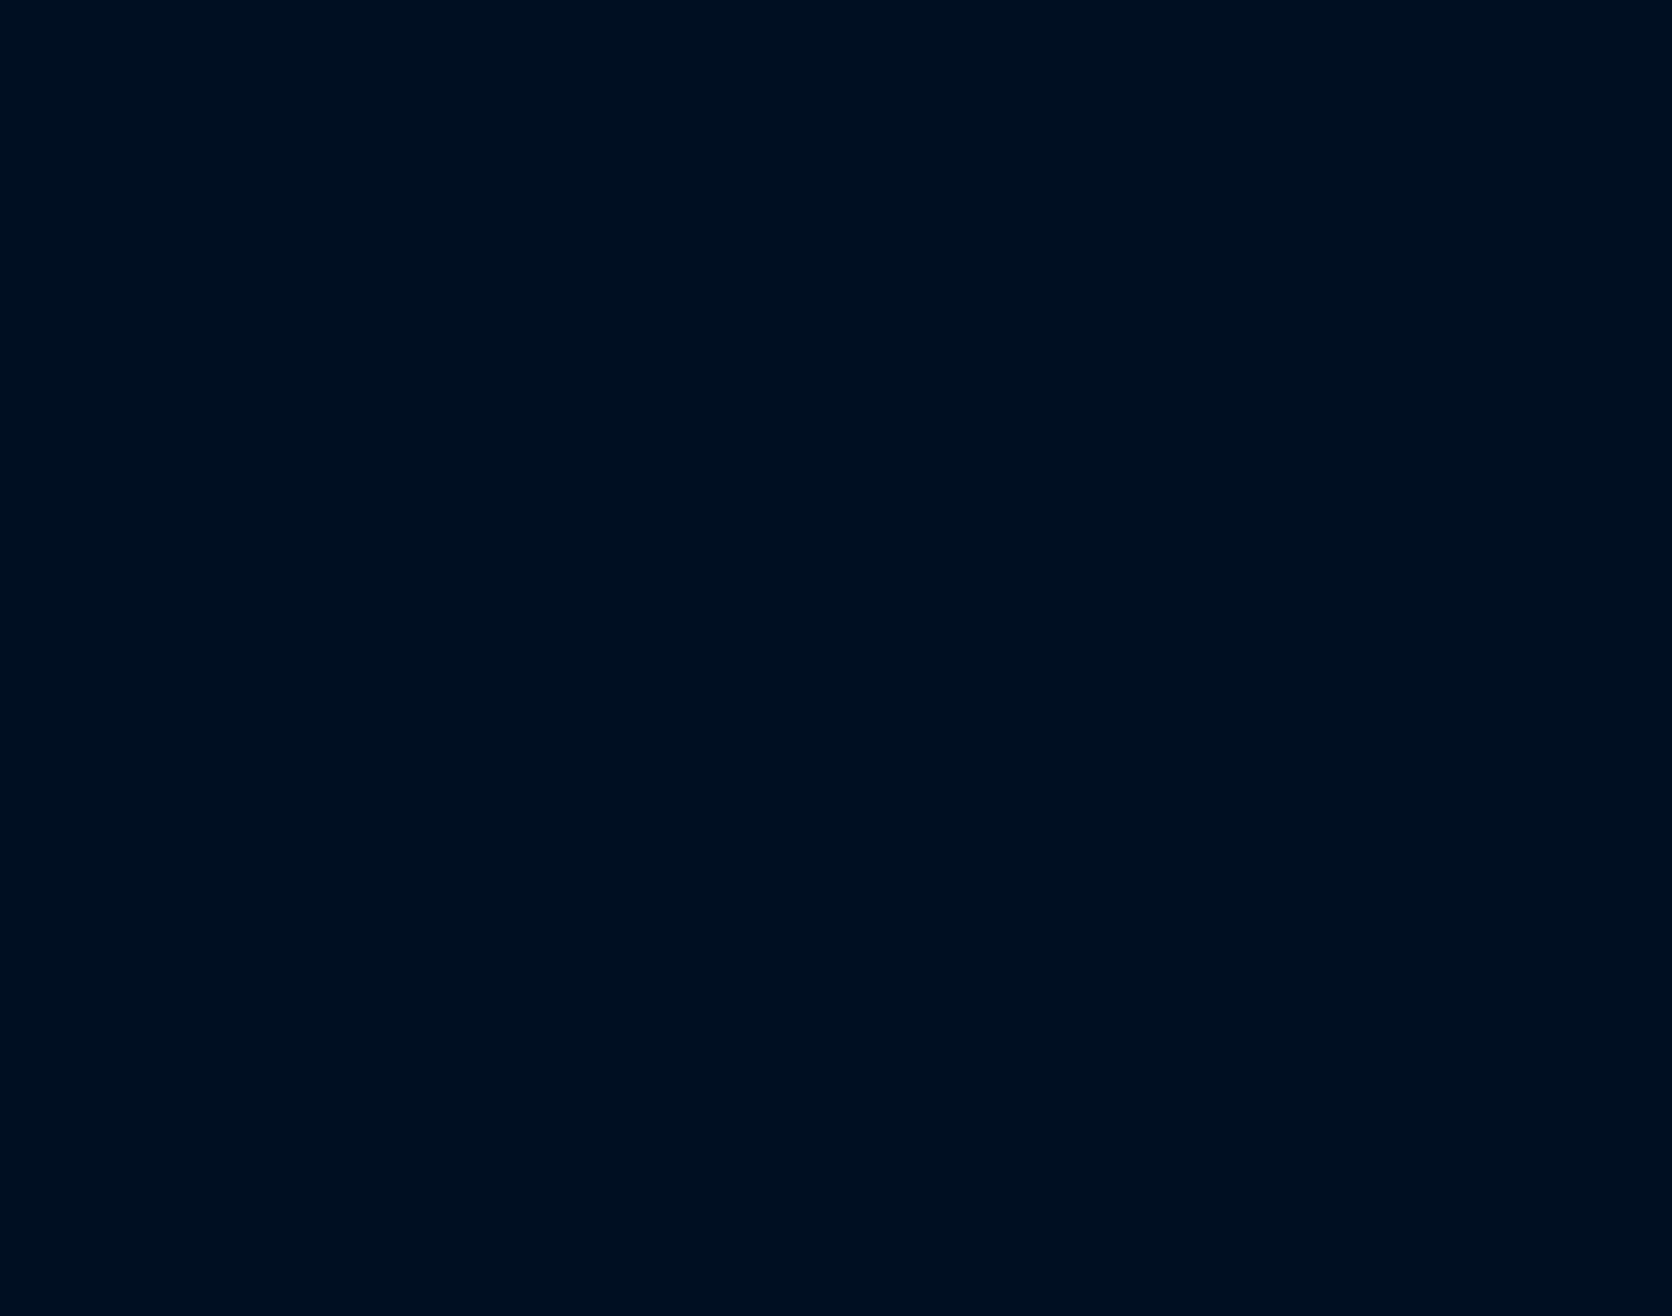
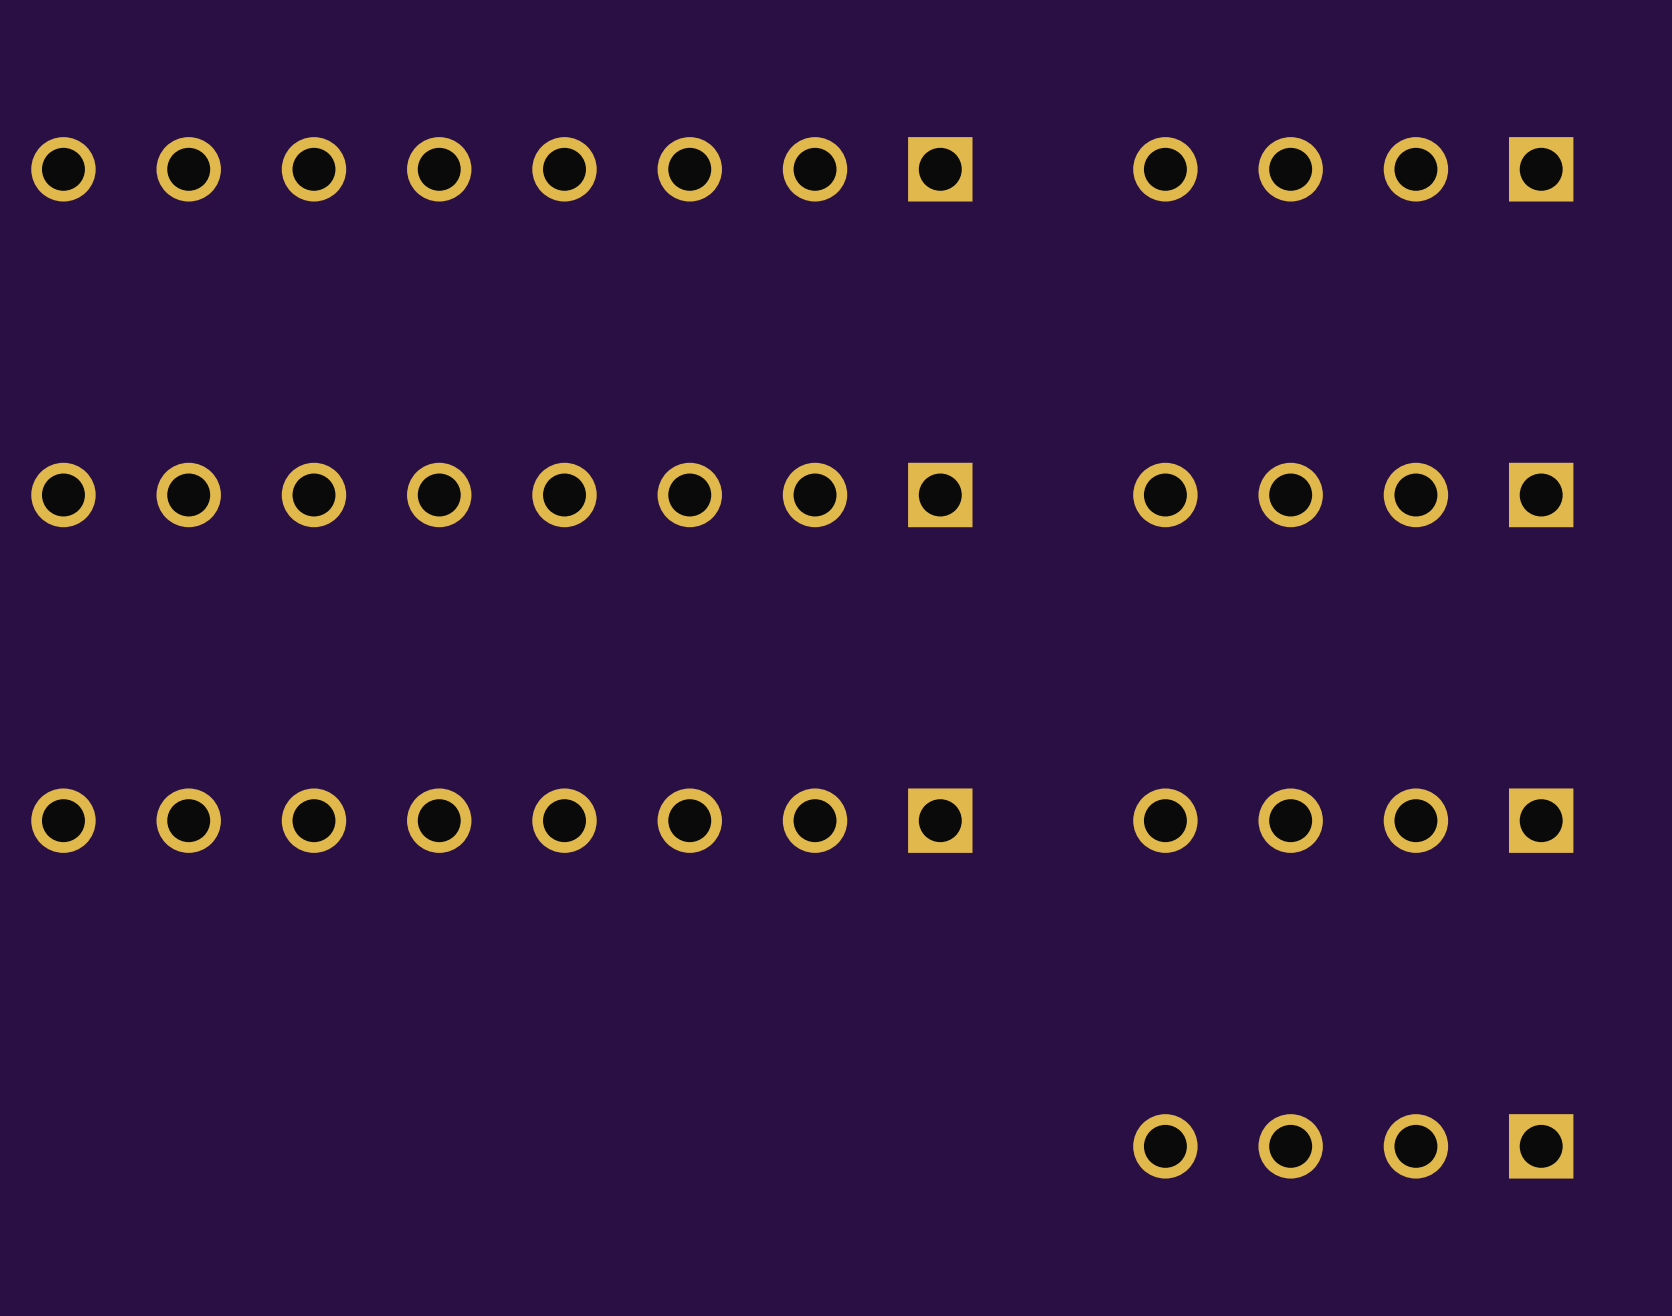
part: none -> (501, 169)
part: none -> (1353, 169)
part: none -> (501, 494)
part: none -> (1353, 494)
part: none -> (501, 820)
part: none -> (1353, 820)
part: none -> (1353, 1146)

